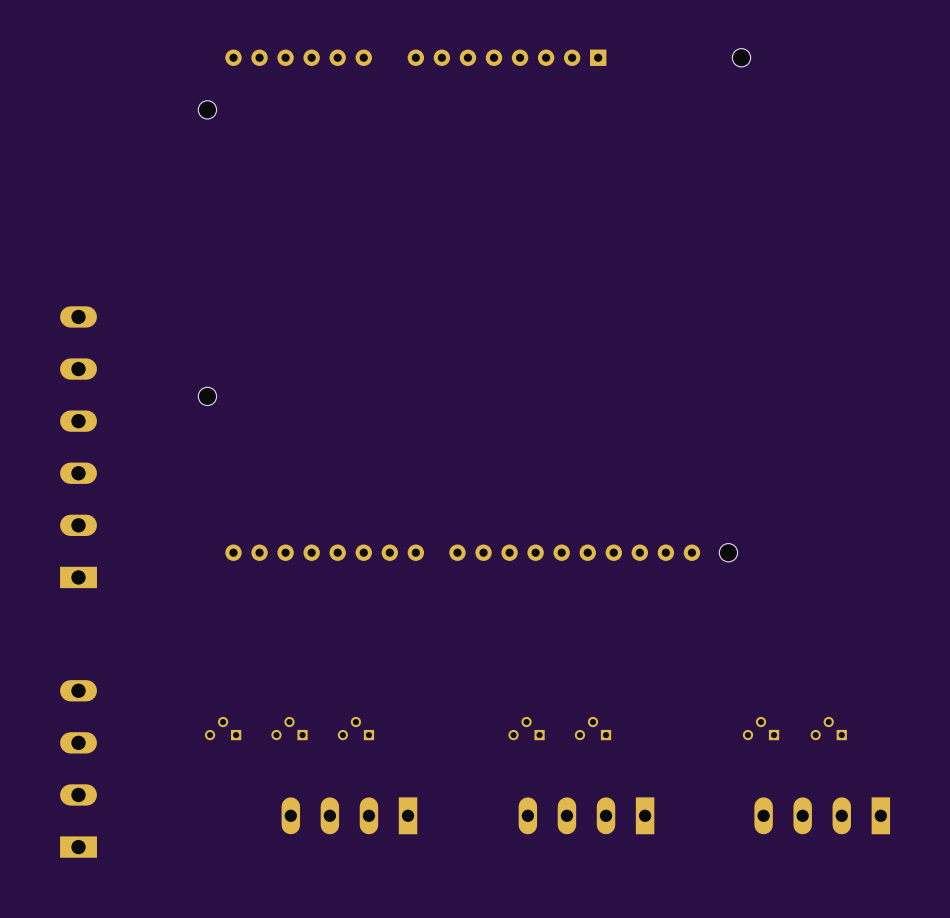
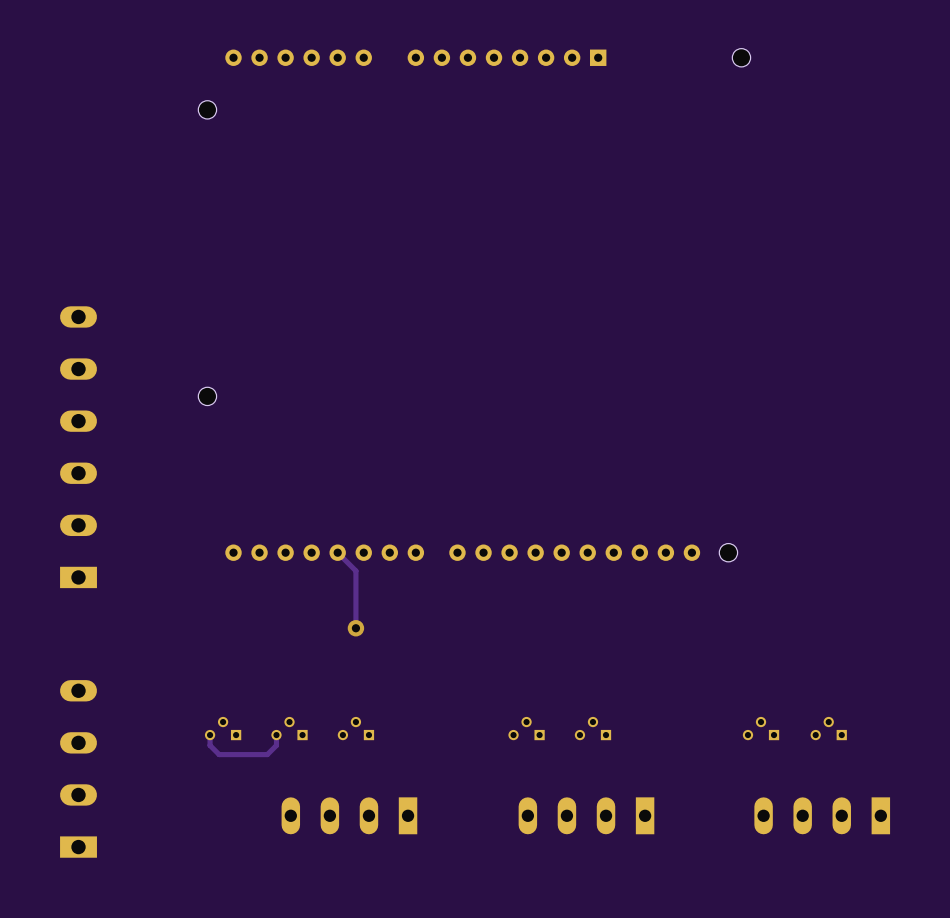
track: none -> (337, 552) (355, 570) (355, 628)
via: none -> (355, 628)
track: none -> (276, 735) (276, 745) (267, 754) (219, 754) (210, 745) (210, 735)

